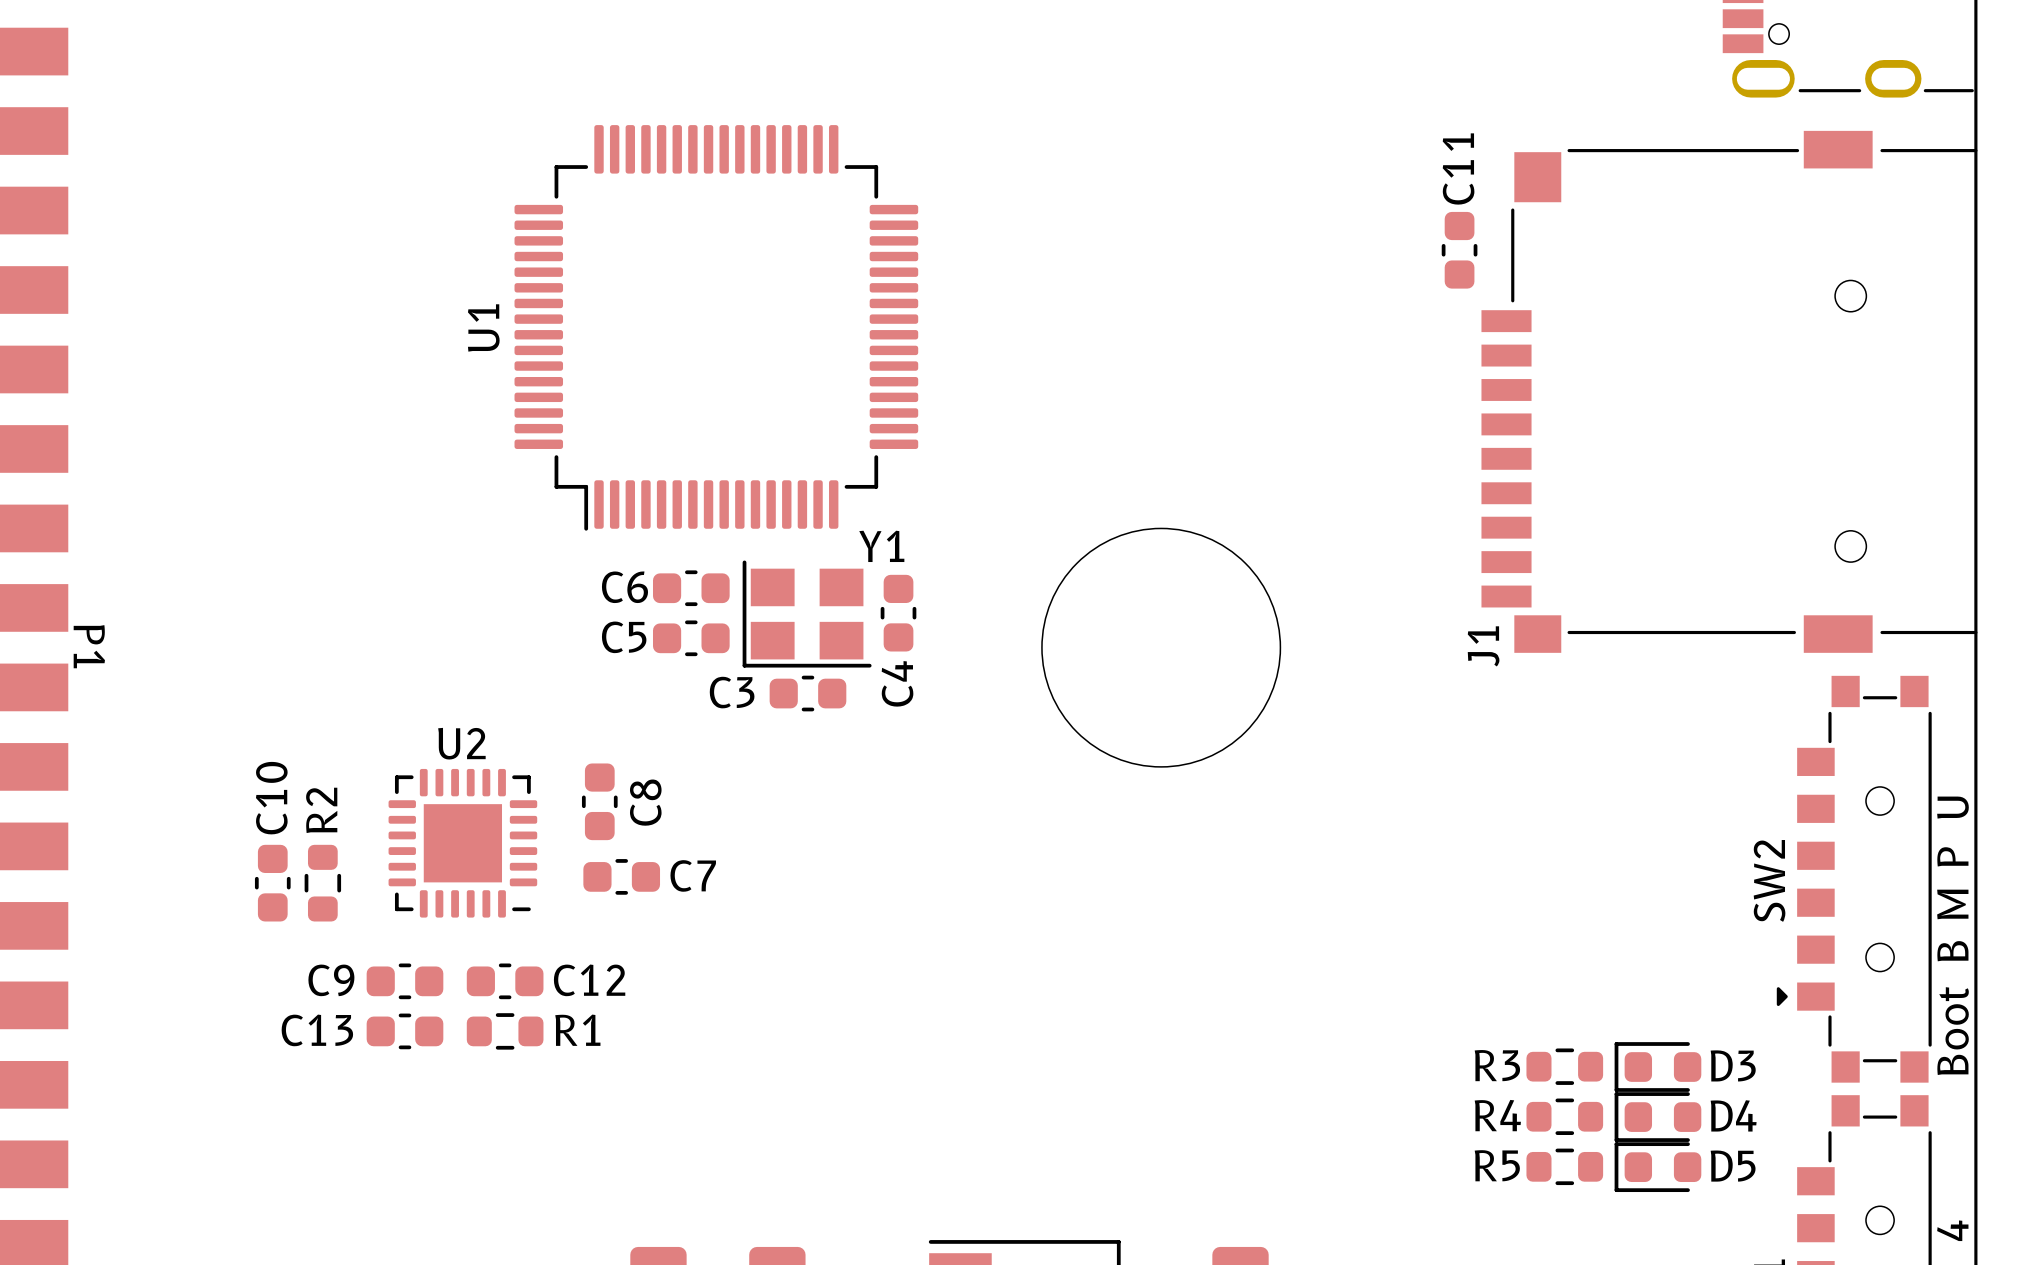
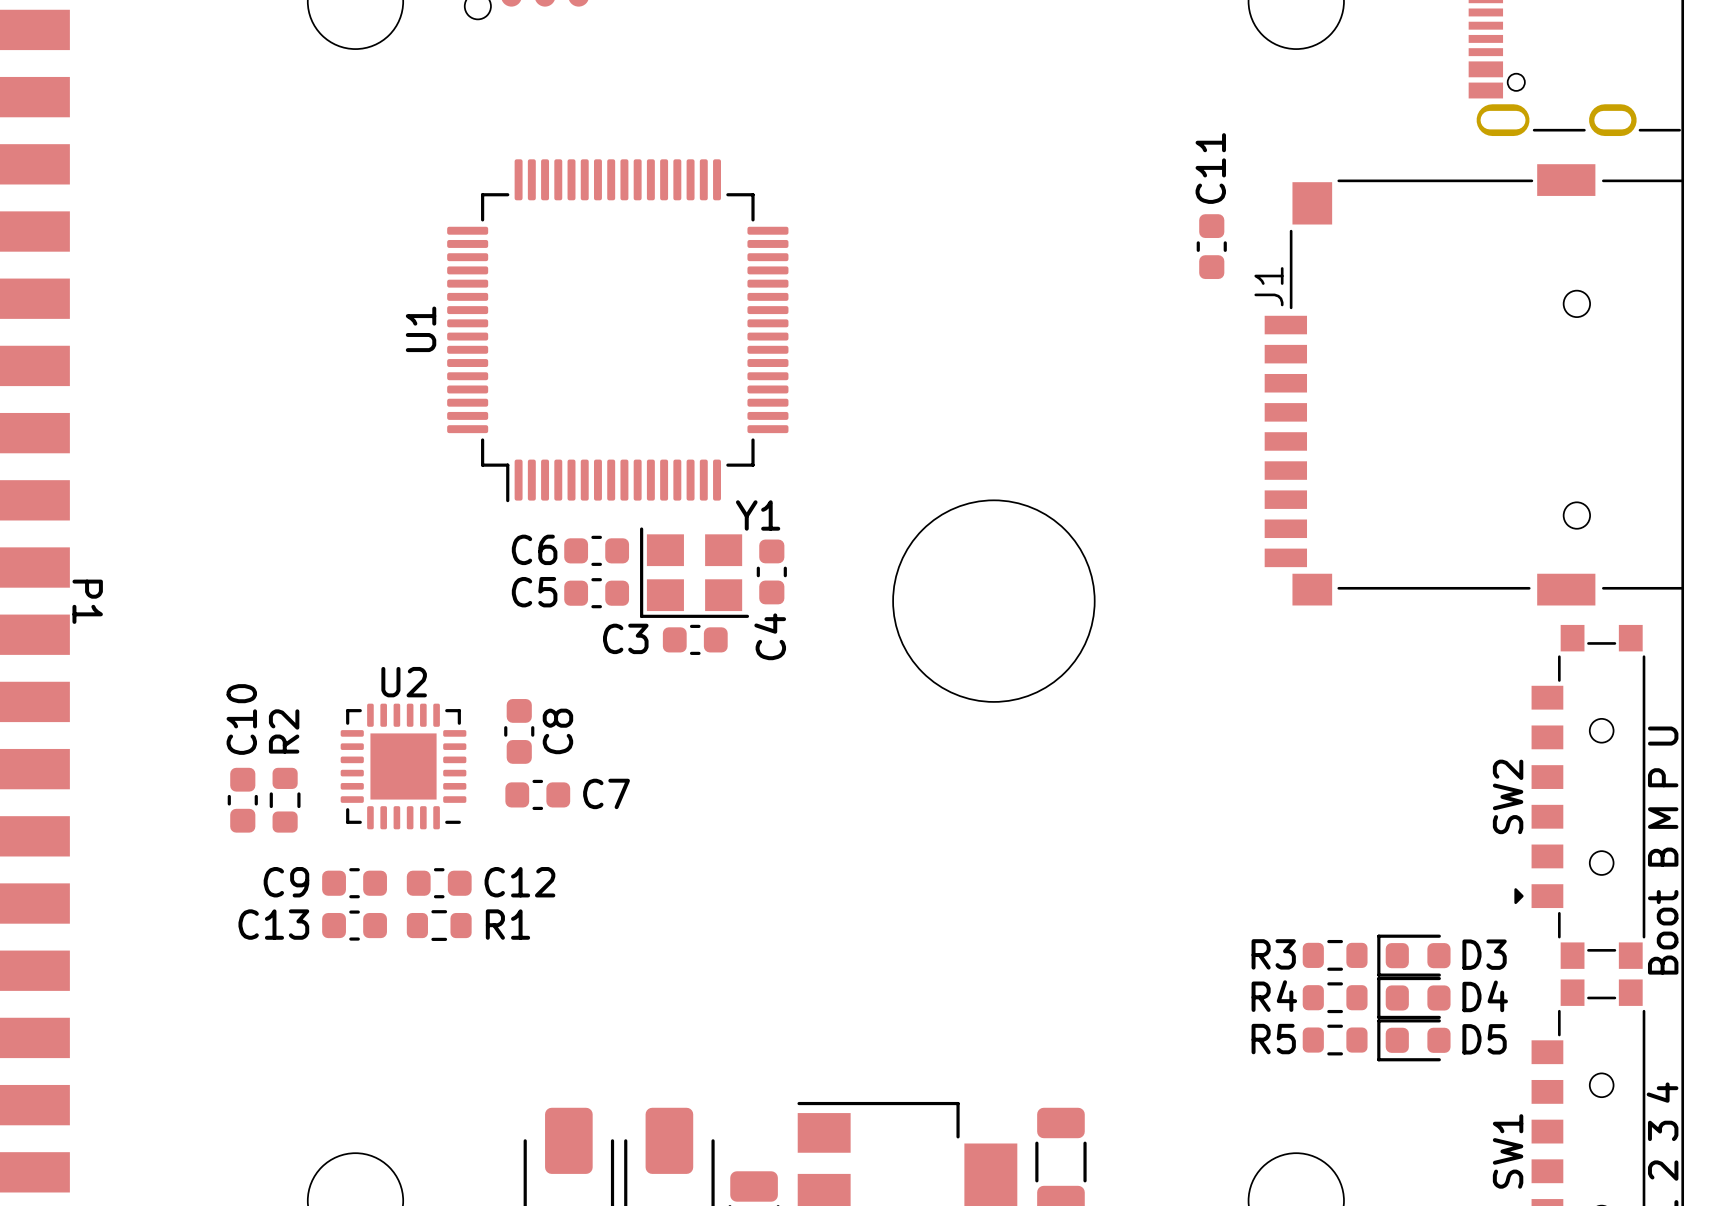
C11 position: (1459, 250) -> (1211, 246)
J1 name position: J1 (1483, 646) -> J1 (1268, 286)

